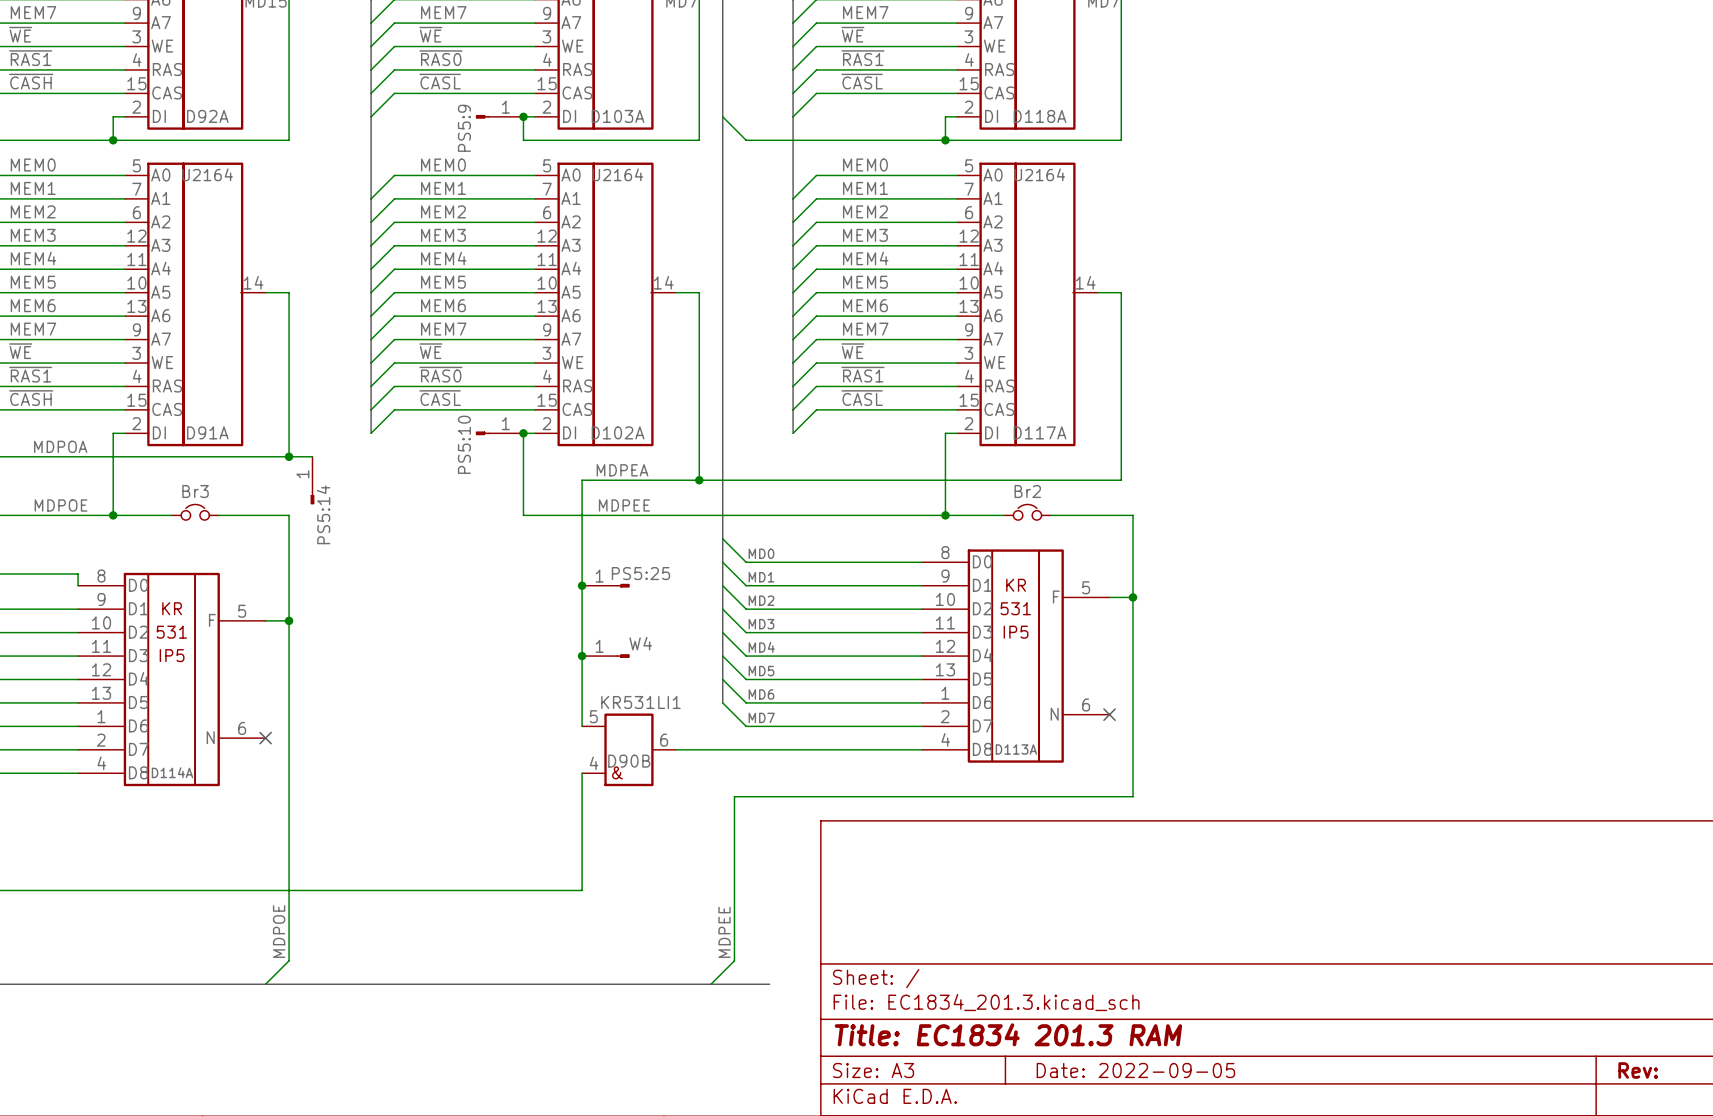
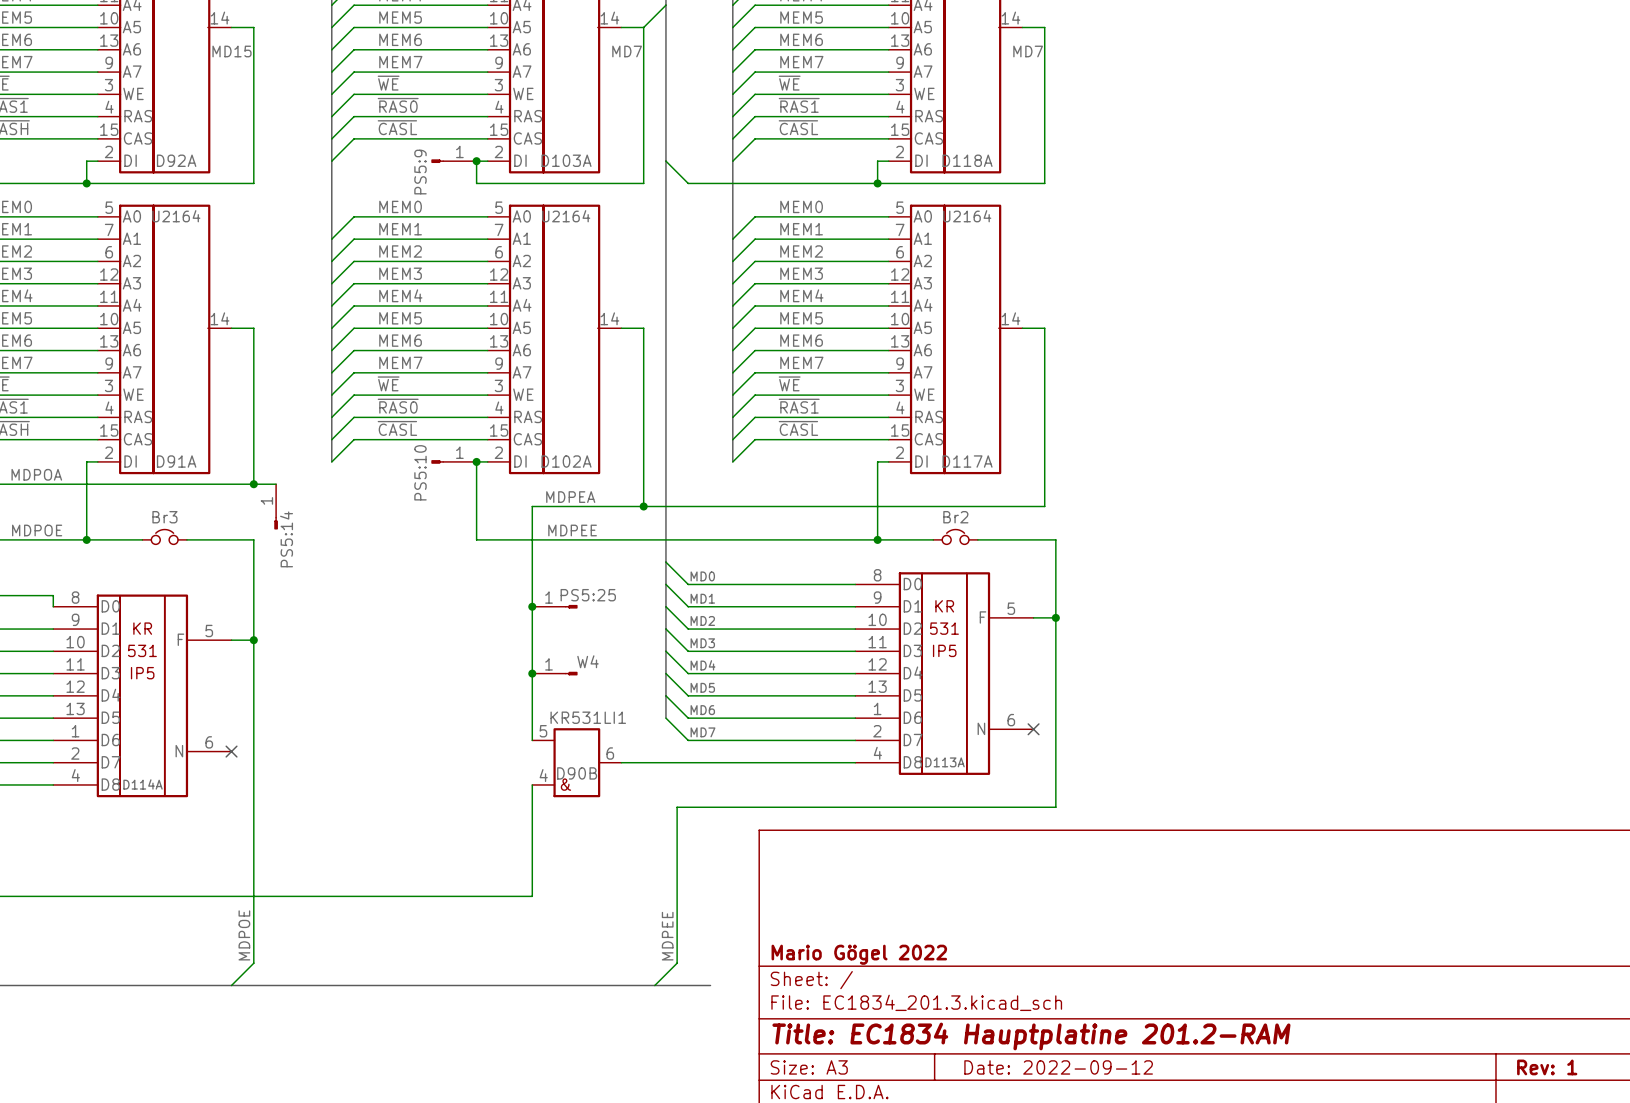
title block: none -> Mario Gögel 2022 (859, 954)
title block: Title: EC1834 201.3 RAM (1008, 1034) -> Title: EC1834 Hauptplatine 201.2-RAM (1031, 1036)
title block: Date: 2022-09-05 (1135, 1070) -> Date: 2022-09-12 (1058, 1067)
title block: Rev: (1638, 1070) -> Rev: 1 (1547, 1067)

